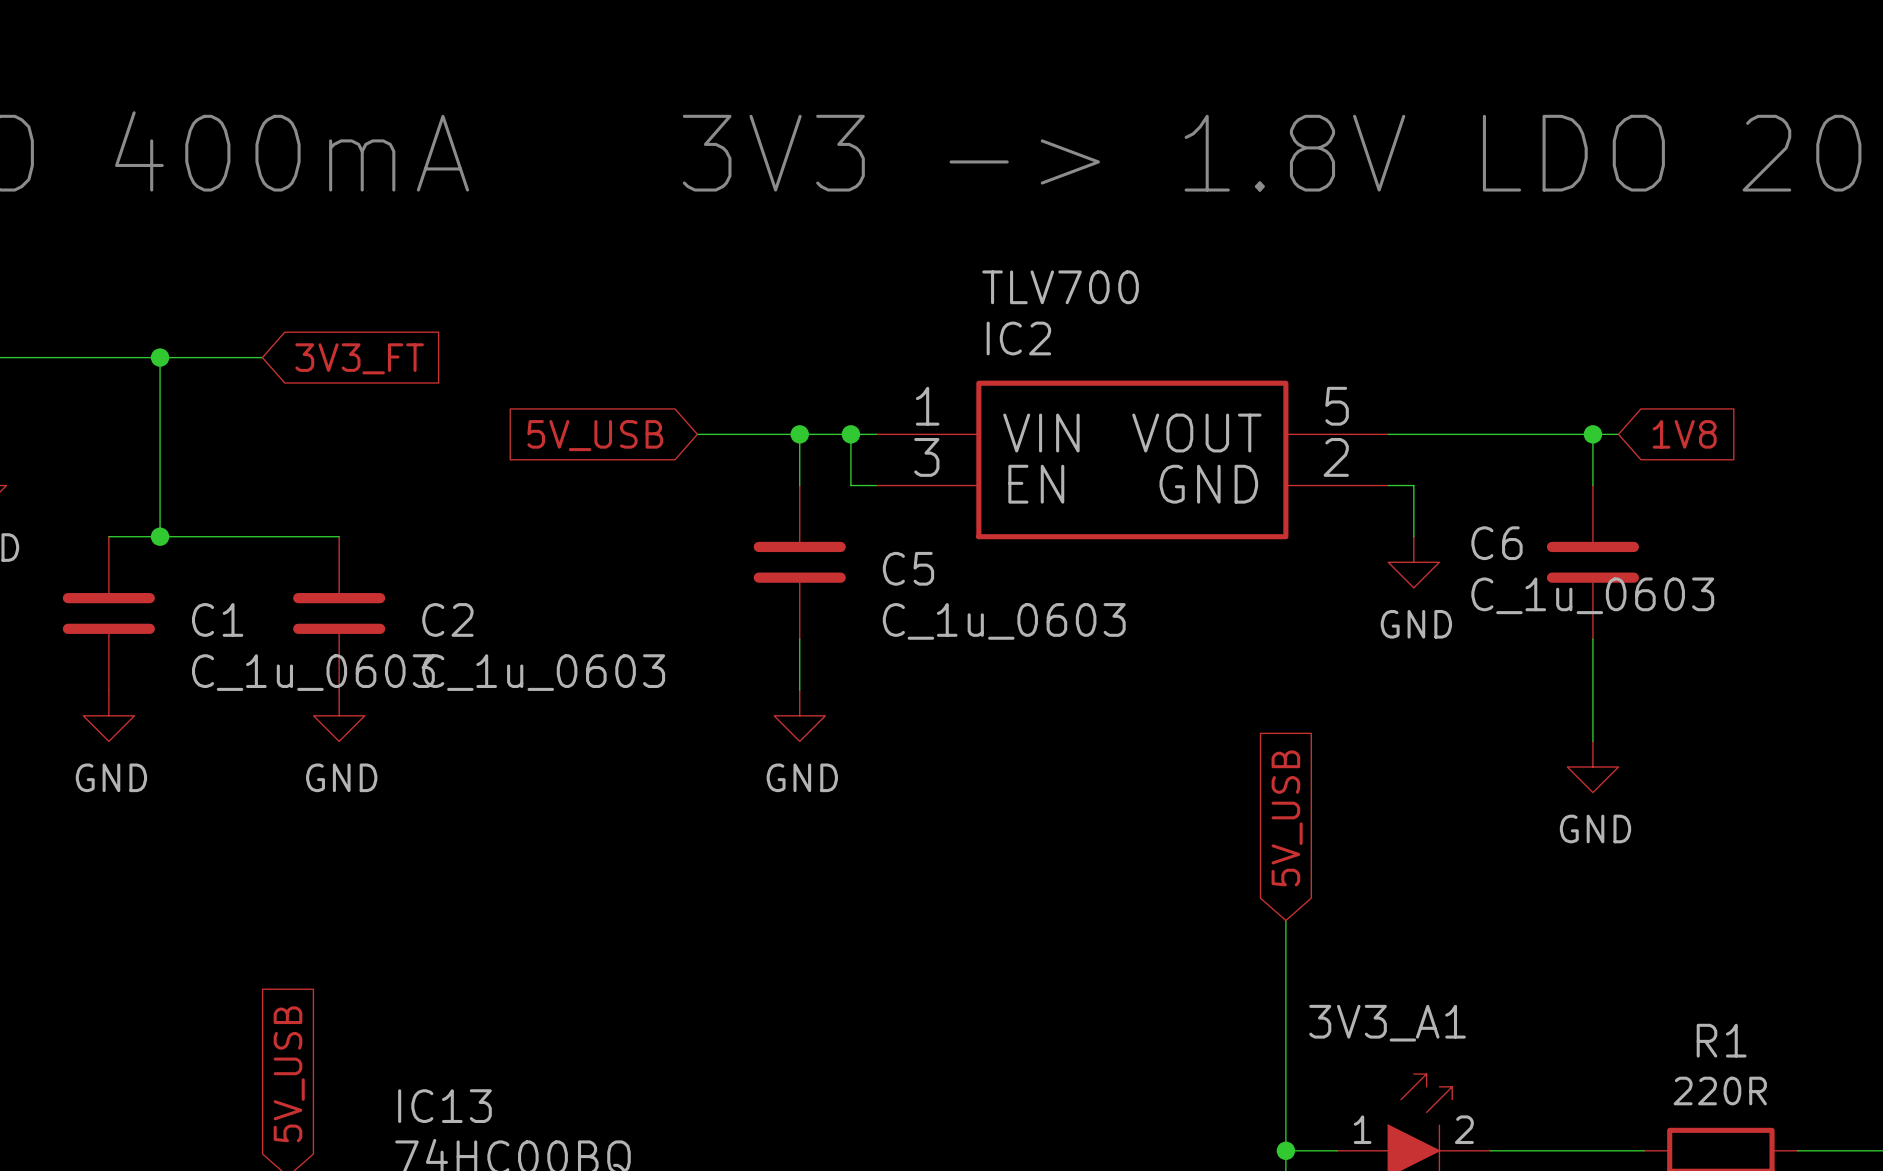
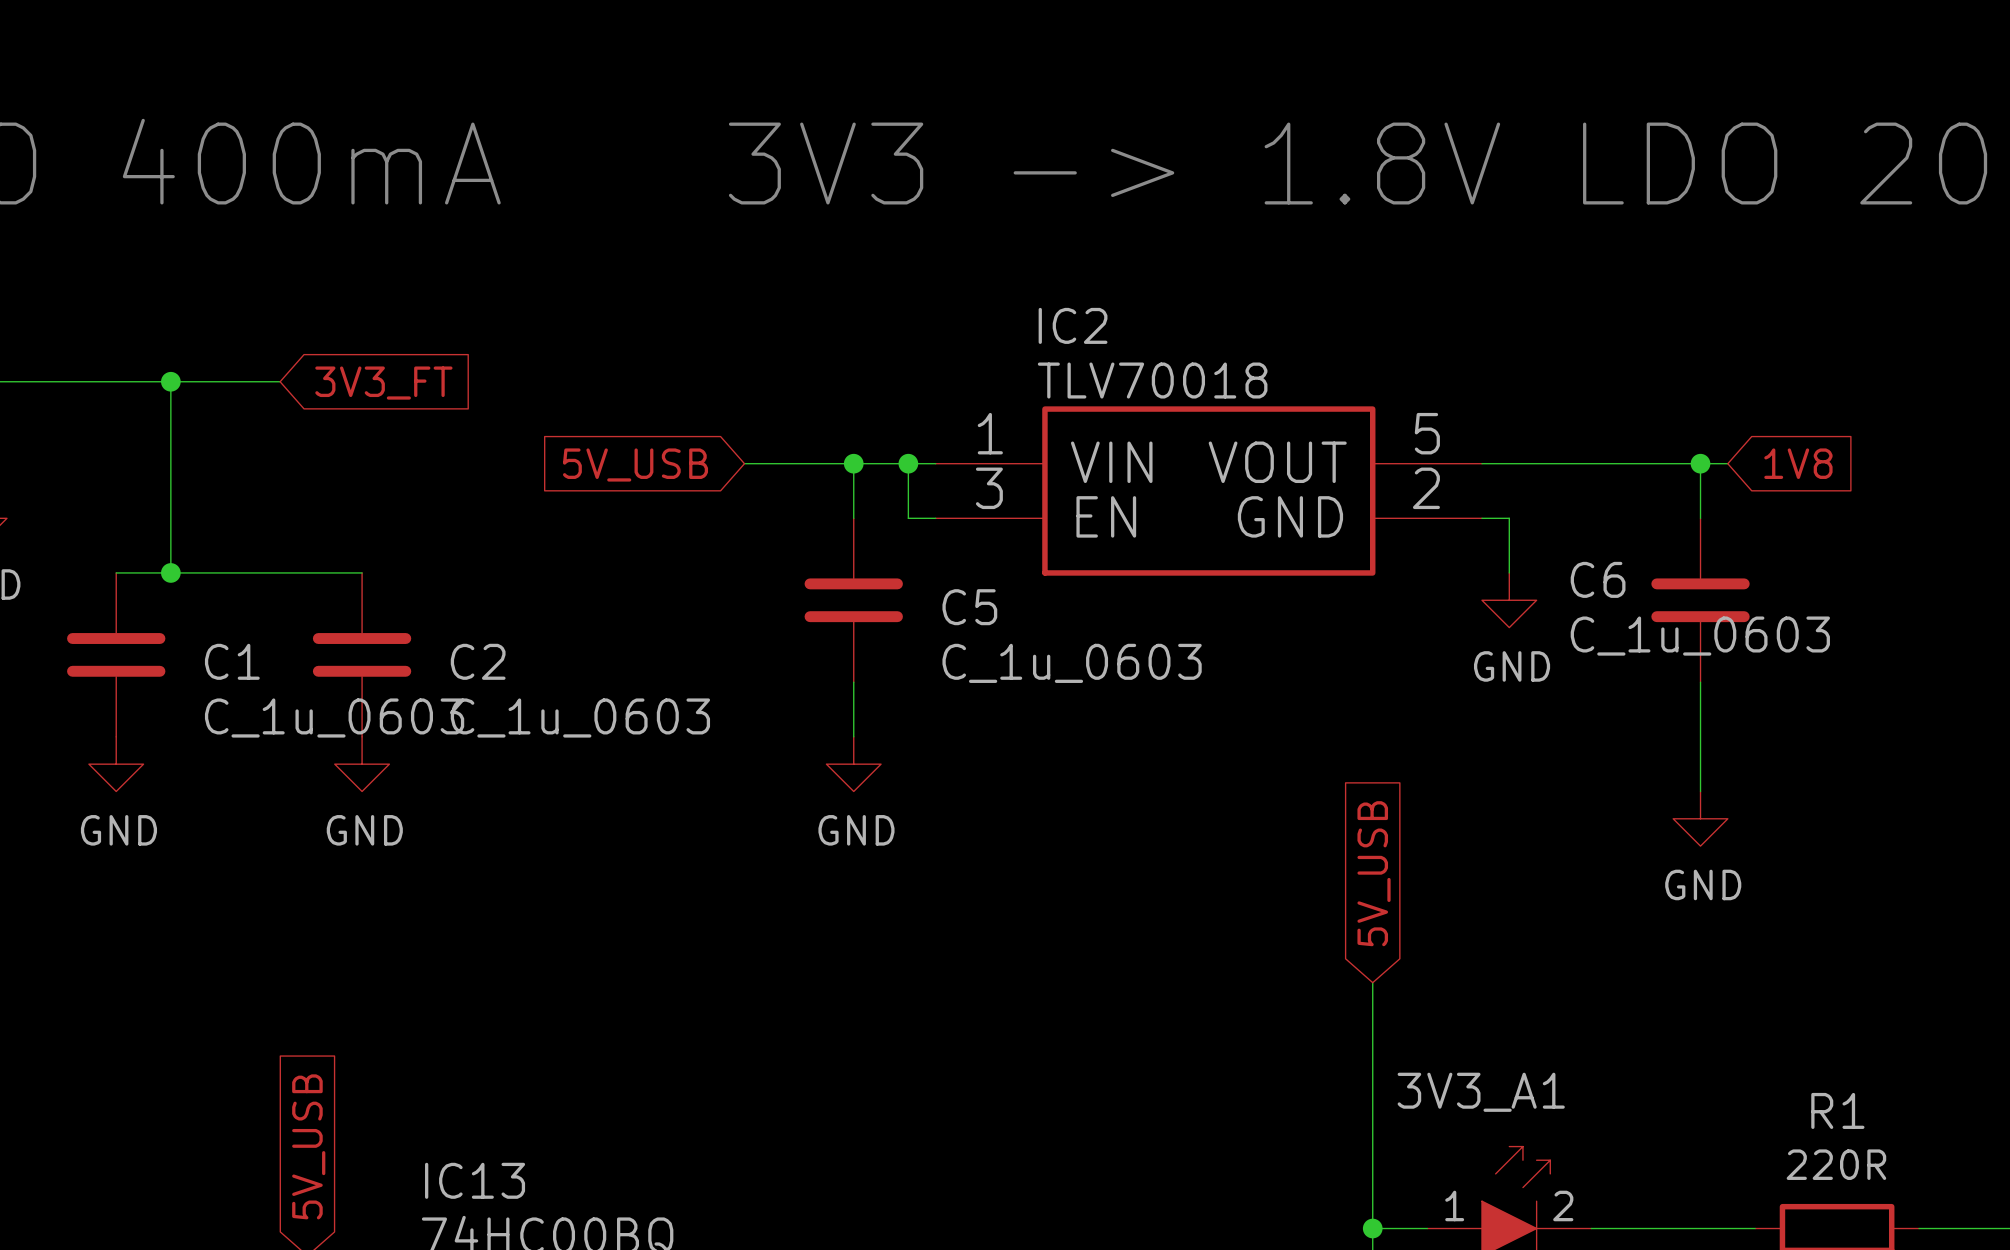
IC2 value: TLV700 (1060, 287) -> TLV70018 (1152, 380)
IC2 name position: IC2 (1018, 338) -> IC2 (1073, 325)

